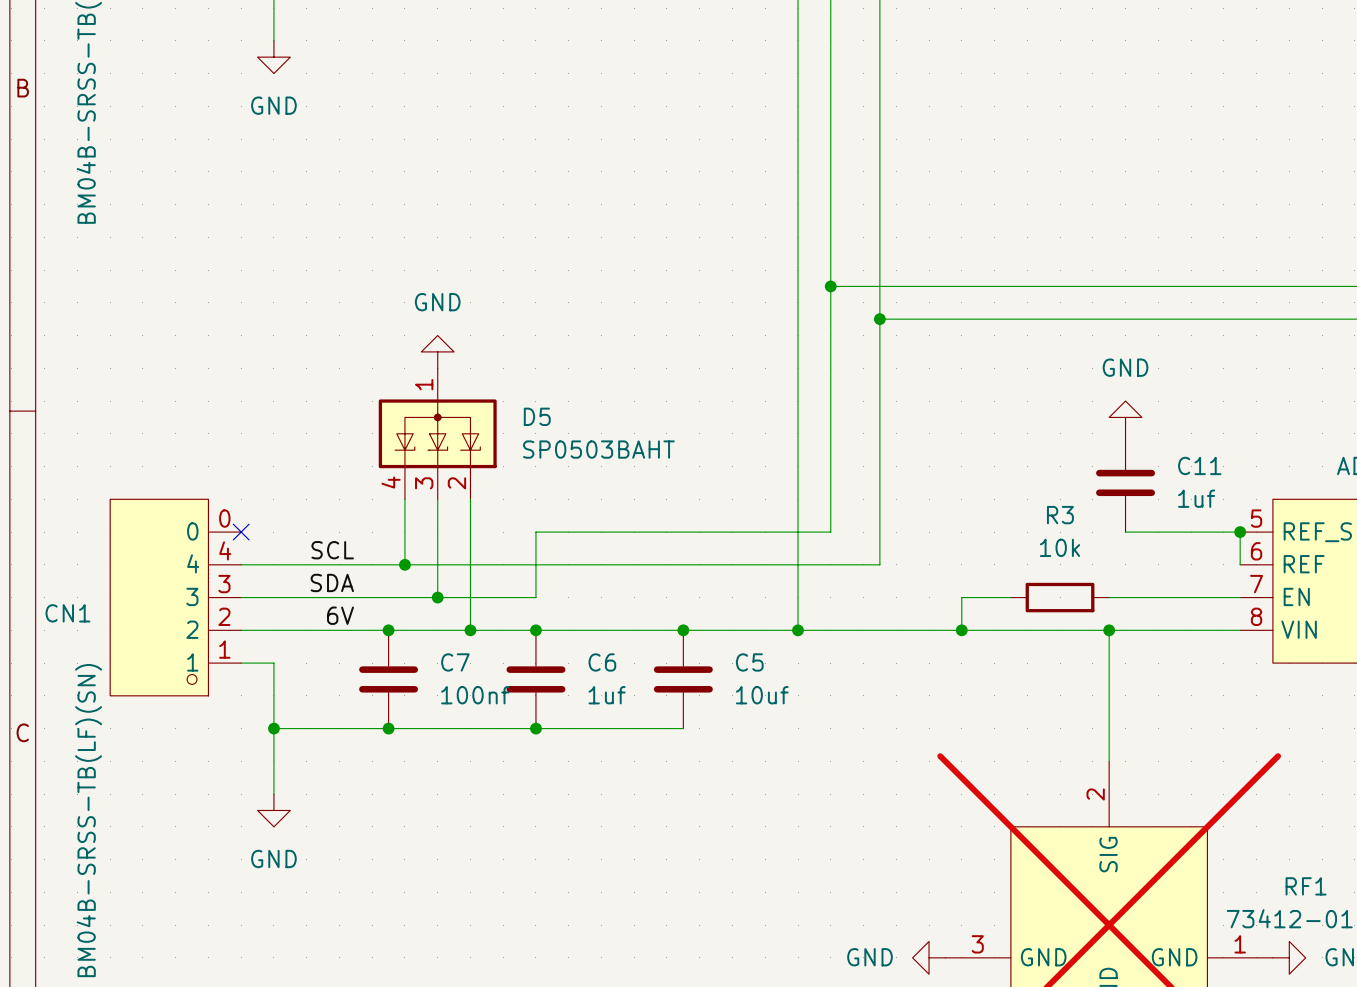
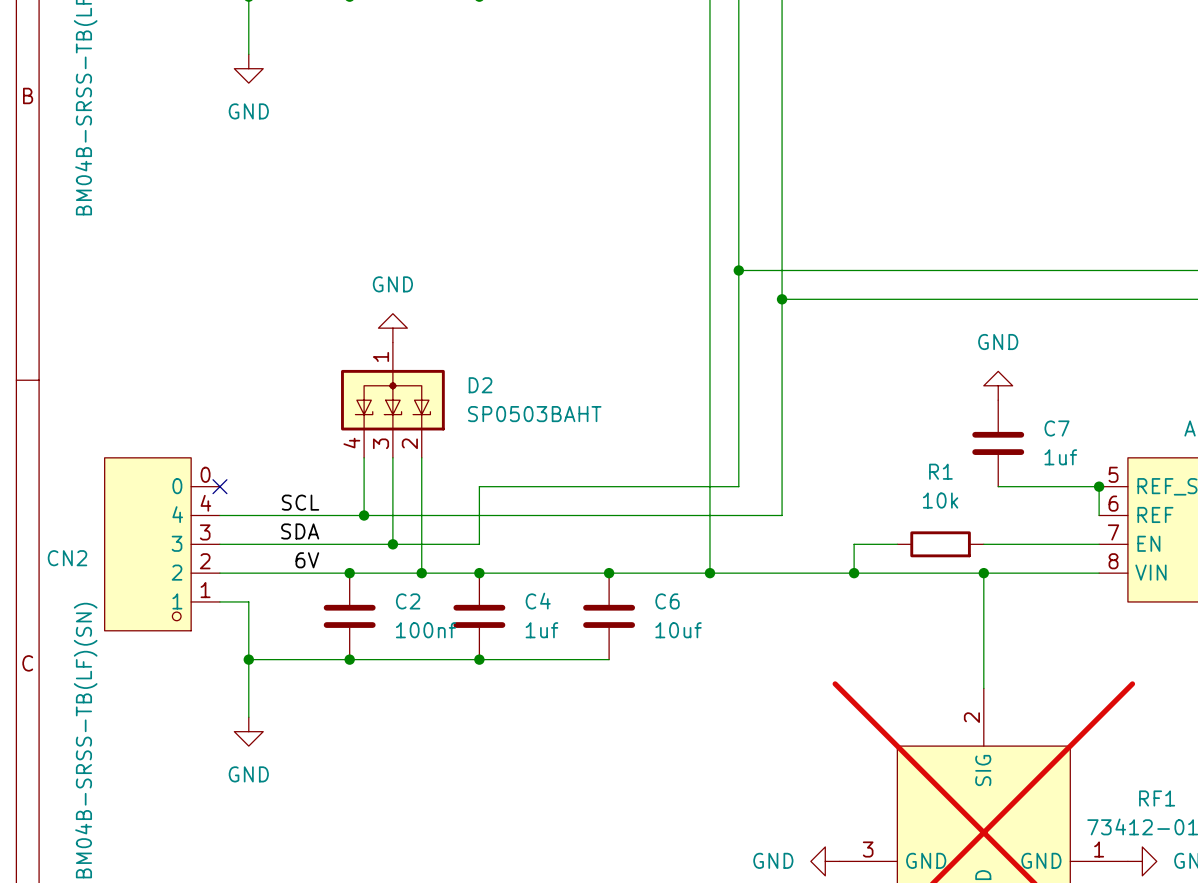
D5 name: D5 (537, 416) -> D2 (480, 385)
C11 name: C11 (1199, 465) -> C7 (1057, 428)
R3 name: R3 (1060, 515) -> R1 (940, 471)
CN1 name: CN1 (67, 613) -> CN2 (67, 558)
C7 name: C7 (455, 662) -> C2 (408, 601)
C6 name: C6 (602, 662) -> C4 (538, 601)
C5 name: C5 (749, 662) -> C6 (667, 601)

